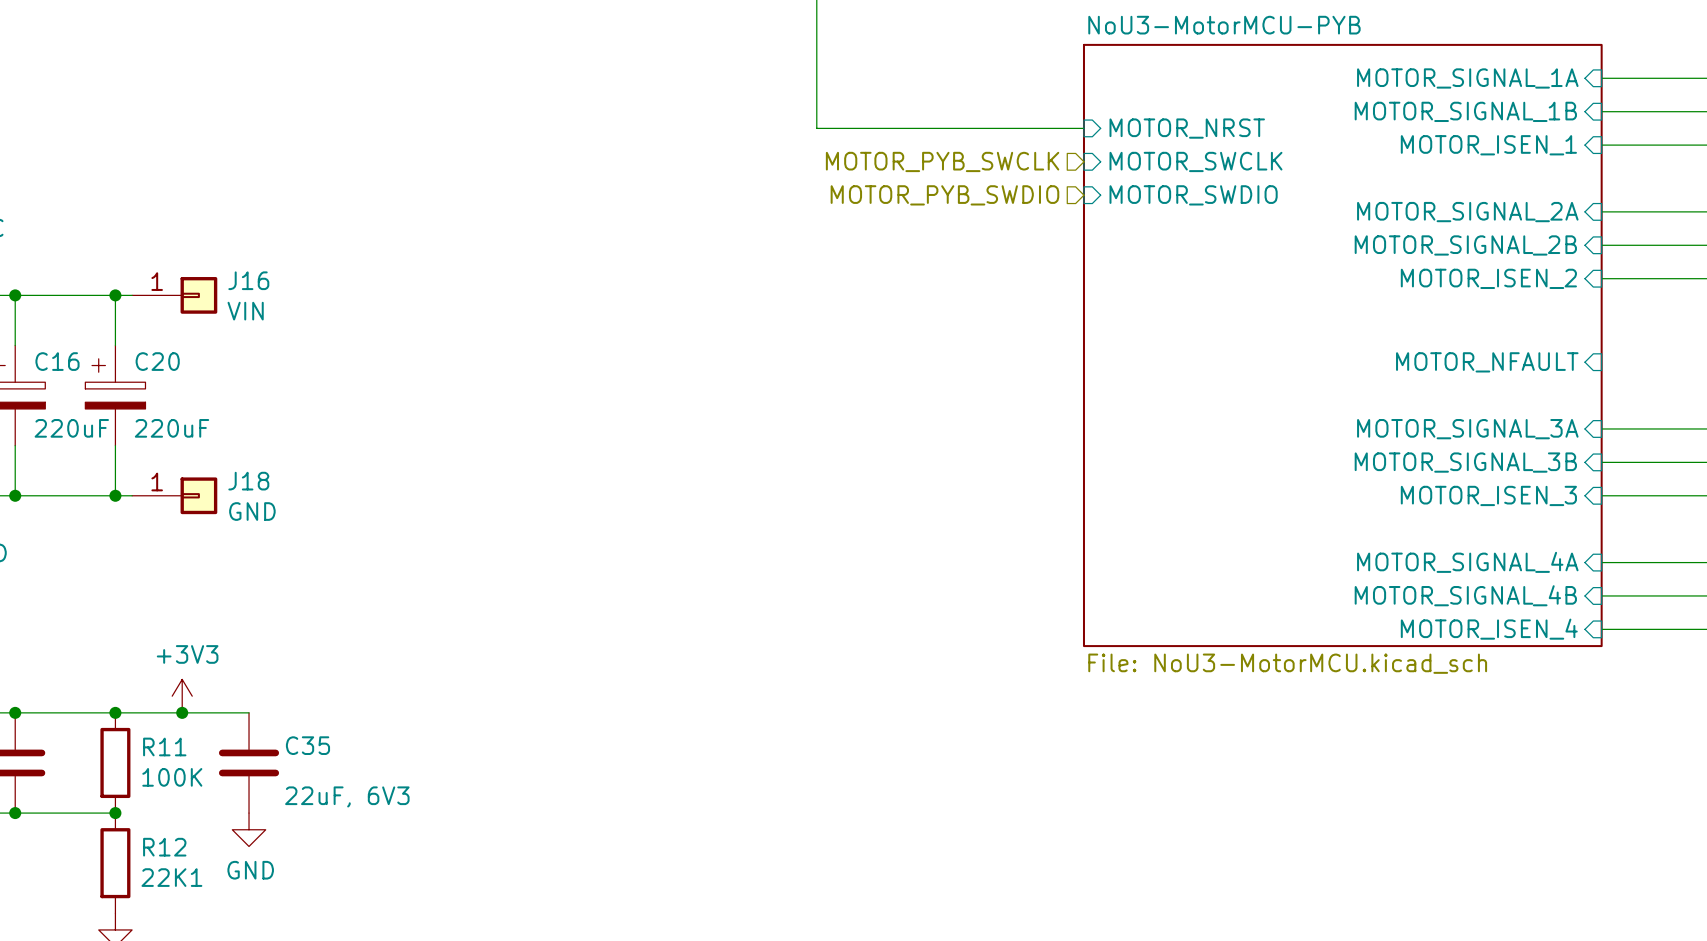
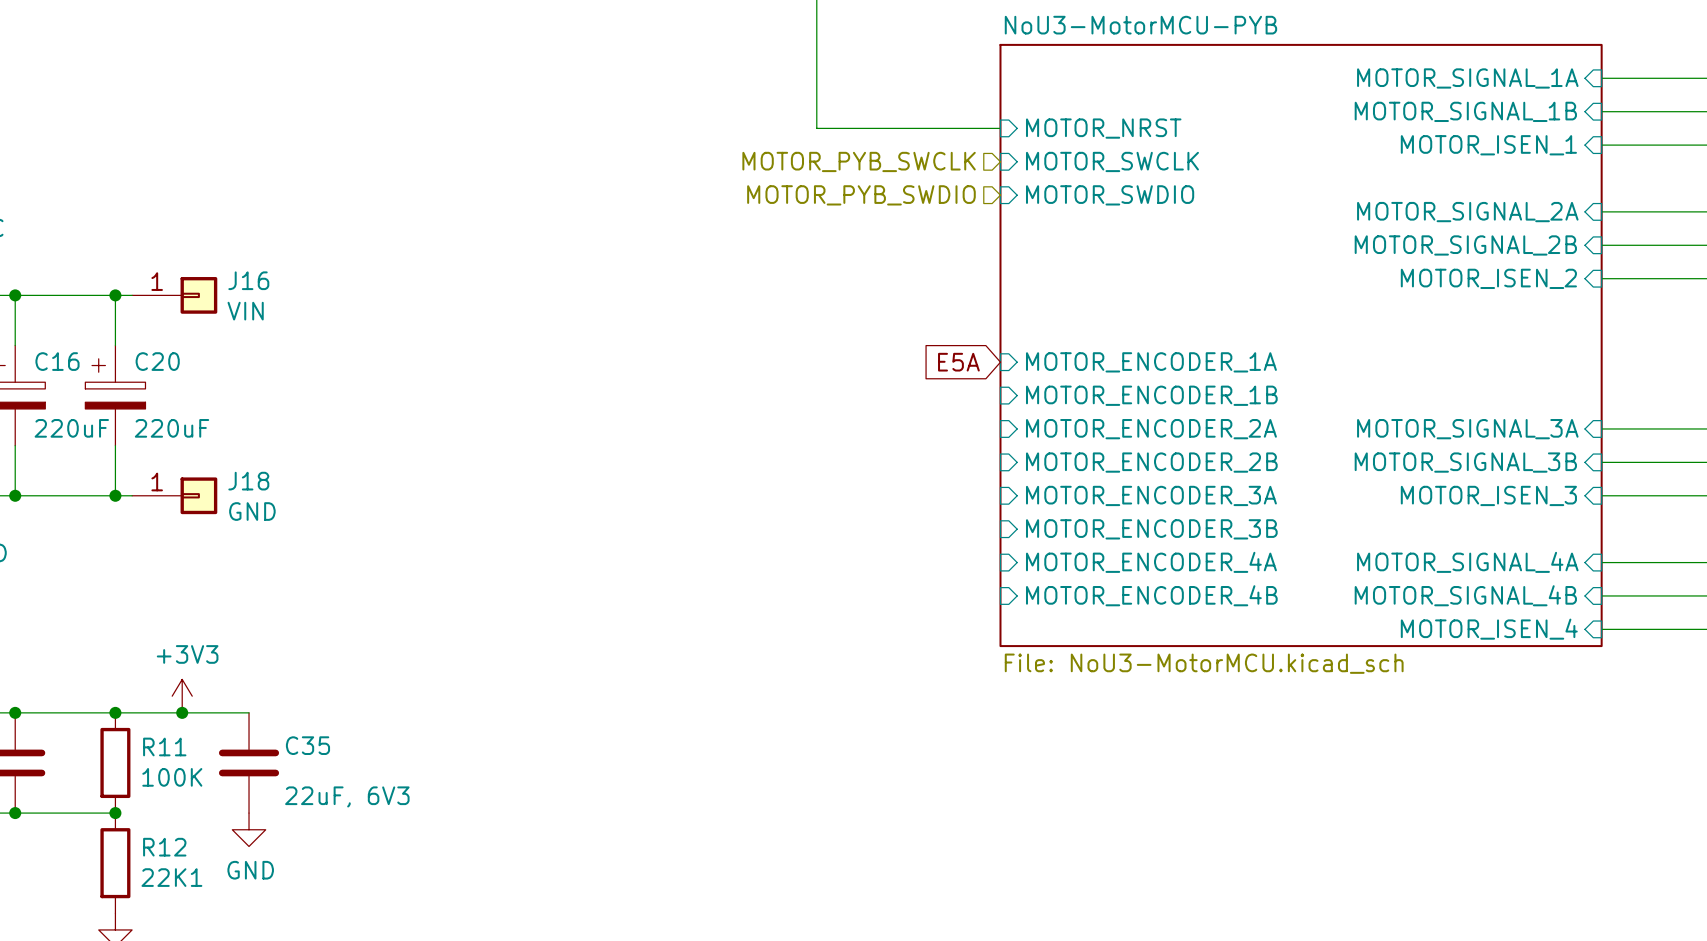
sheet NoU3-MotorMCU-PYB name position: NoU3-MotorMCU-PYB (1224, 25) -> NoU3-MotorMCU-PYB (1140, 25)
sheet NoU3-MotorMCU-PYB shape: [1082, 43, 1603, 648] -> [999, 43, 1603, 648]
wire: (1000, 128) (1083, 128) -> none
sheet pin position: MOTOR_NRST (1187, 128) -> MOTOR_NRST (1103, 128)
hierarchical label position: MOTOR_PYB_SWCLK (942, 161) -> MOTOR_PYB_SWCLK (859, 161)
sheet pin position: MOTOR_SWCLK (1195, 161) -> MOTOR_SWCLK (1112, 161)
hierarchical label position: MOTOR_PYB_SWDIO (944, 195) -> MOTOR_PYB_SWDIO (861, 195)
sheet pin position: MOTOR_SWDIO (1193, 195) -> MOTOR_SWDIO (1110, 195)
global label: none -> E5A (958, 362)
sheet pin: none -> MOTOR_ENCODER_1A (1151, 362)
sheet pin: MOTOR_NFAULT (1487, 362) -> none
sheet pin: none -> MOTOR_ENCODER_1B (1151, 395)
sheet pin: none -> MOTOR_ENCODER_2A (1151, 429)
sheet pin: none -> MOTOR_ENCODER_2B (1151, 462)
sheet pin: none -> MOTOR_ENCODER_3A (1151, 495)
sheet pin: none -> MOTOR_ENCODER_3B (1151, 529)
sheet pin: none -> MOTOR_ENCODER_4A (1151, 562)
sheet pin: none -> MOTOR_ENCODER_4B (1151, 595)
sheet NoU3-MotorMCU-PYB value position: File: NoU3-MotorMCU.kicad_sch (1287, 663) -> File: NoU3-MotorMCU.kicad_sch (1204, 663)

